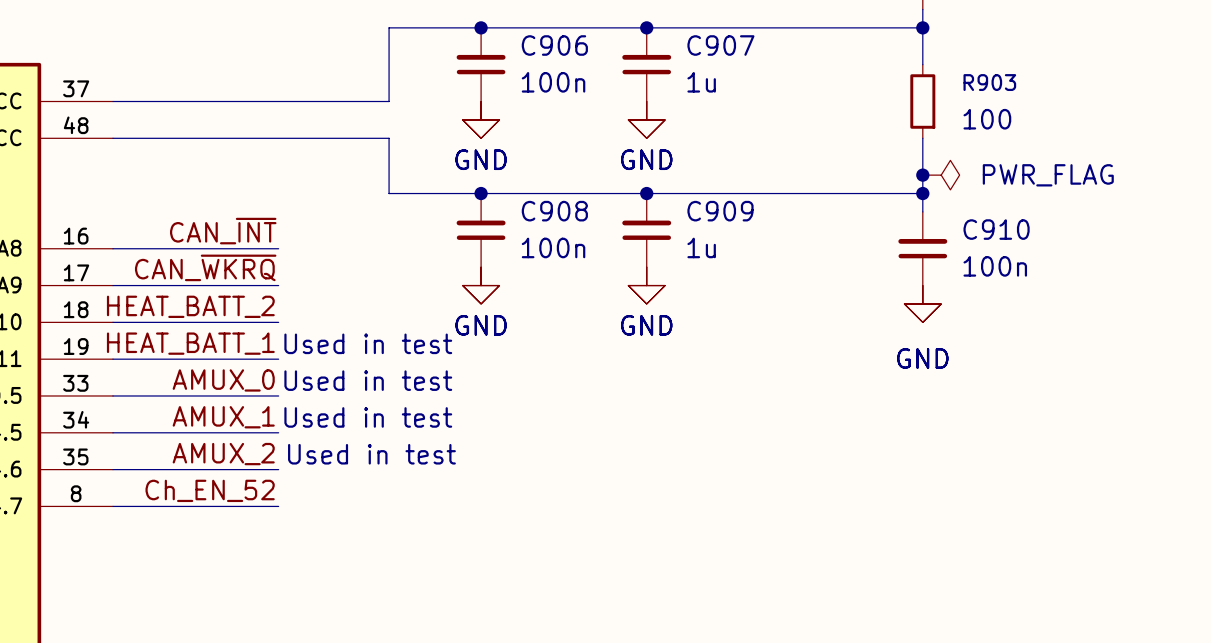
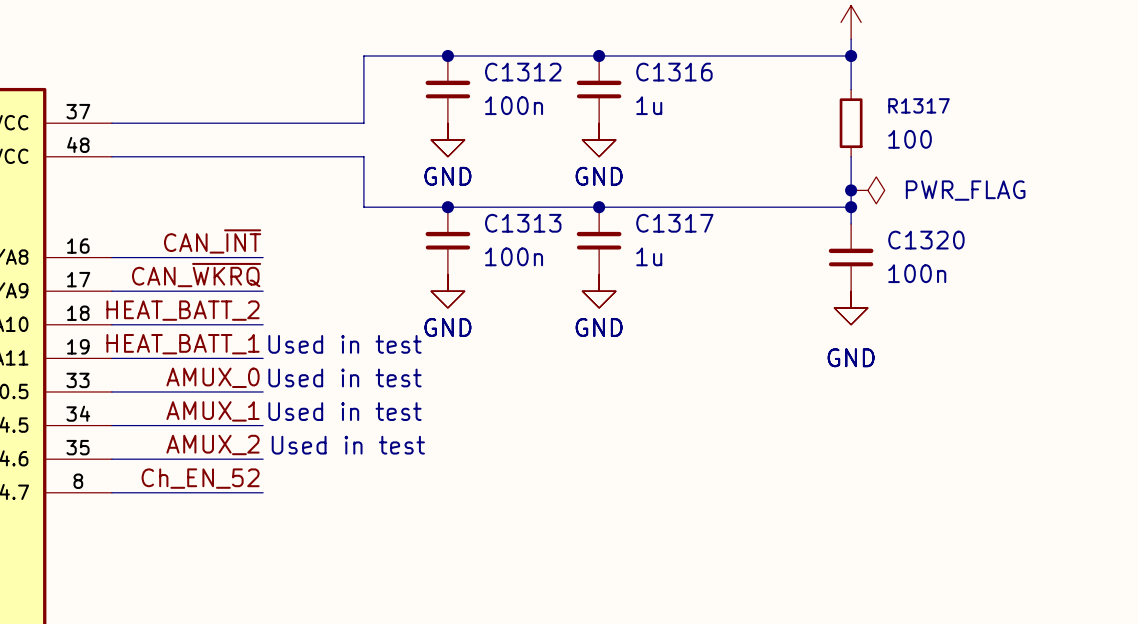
C906 name: C906 (554, 45) -> C1312 (523, 72)
C907 name: C907 (720, 45) -> C1316 (674, 72)
R903 name: R903 (989, 82) -> R1317 (918, 105)
C908 name: C908 (554, 211) -> C1313 (523, 223)
C909 name: C909 (720, 211) -> C1317 (674, 223)
C910 name: C910 (996, 229) -> C1320 (926, 240)

